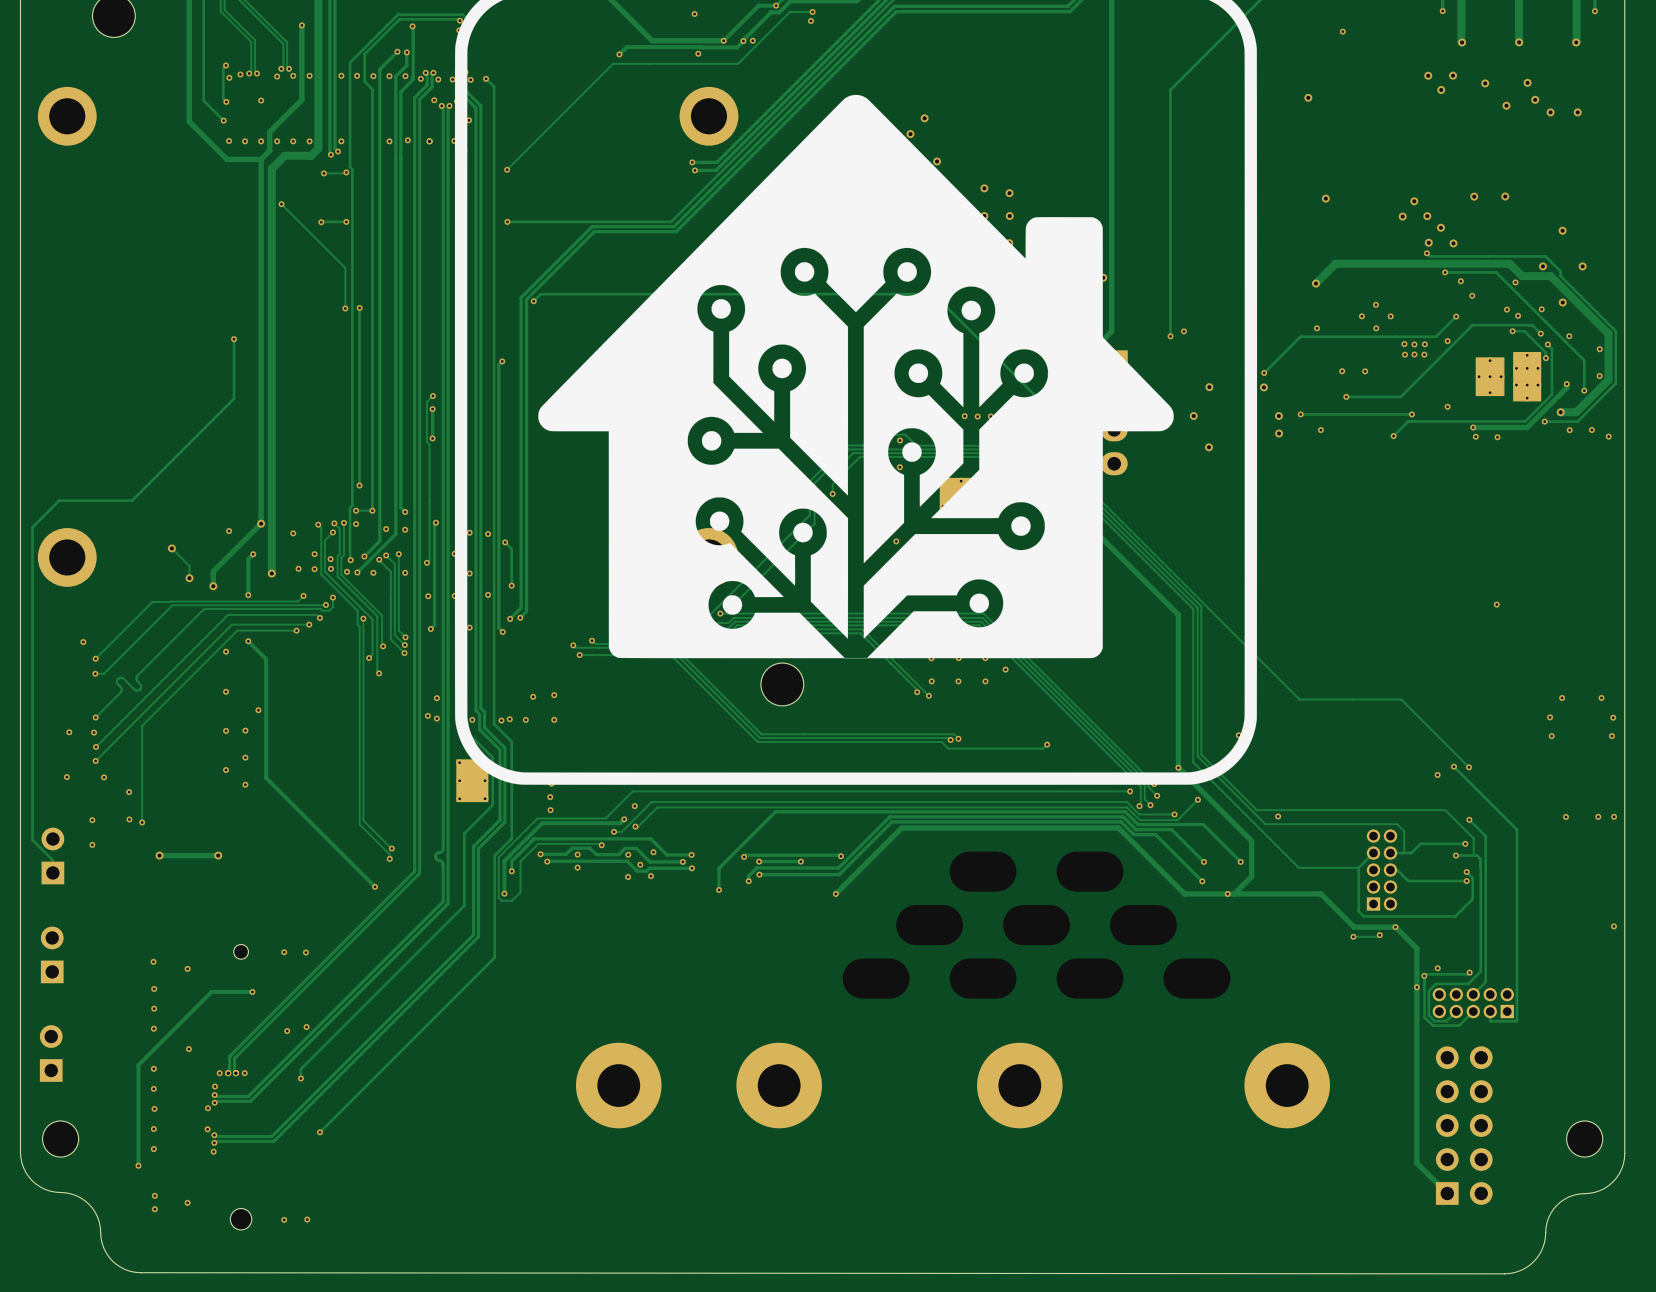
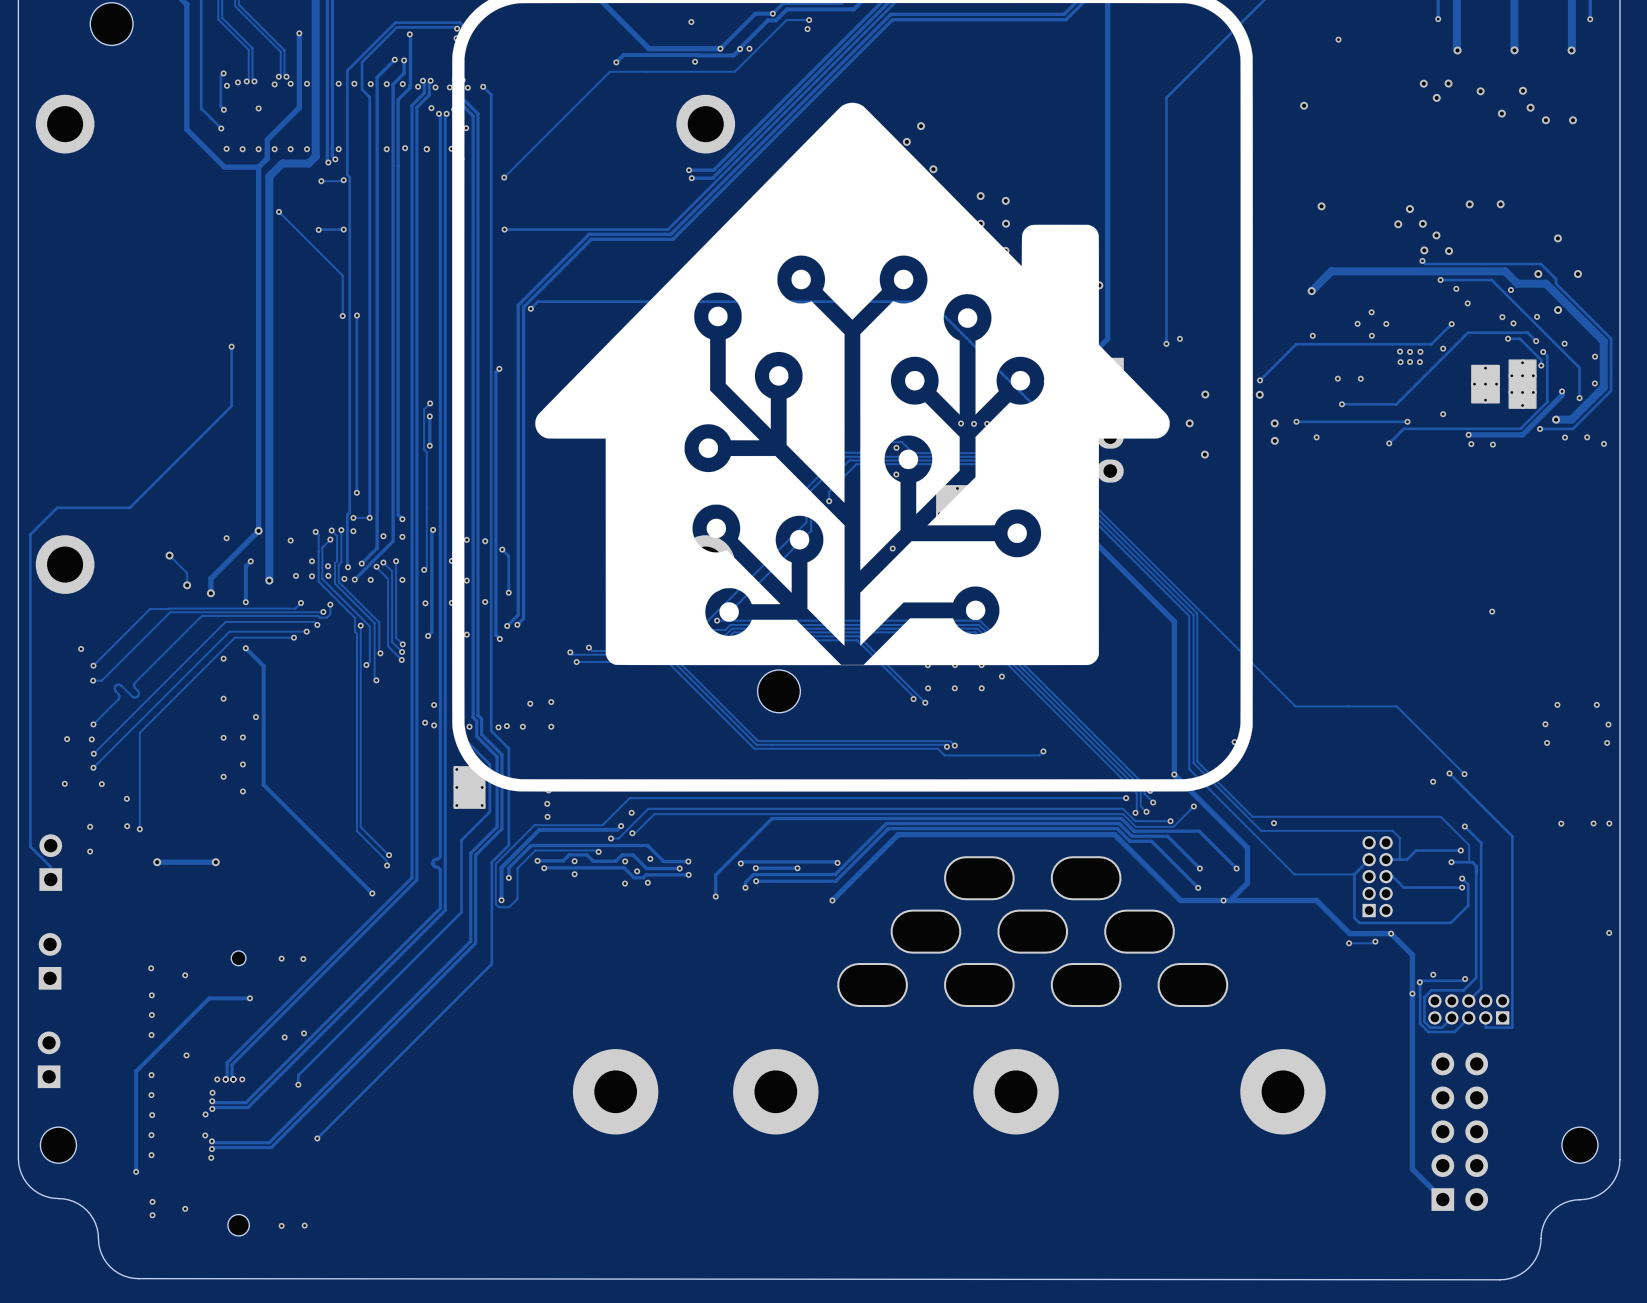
part footprint: [949, 851, 1017, 892] -> [943, 856, 1015, 901]
part footprint: [1056, 851, 1124, 892] -> [1050, 856, 1122, 901]
part footprint: [896, 905, 964, 946] -> [890, 909, 962, 954]
part footprint: [1003, 905, 1070, 946] -> [997, 909, 1069, 954]
part footprint: [1110, 905, 1177, 946] -> [1104, 909, 1175, 954]
part footprint: [842, 958, 910, 999] -> [837, 962, 908, 1008]
part footprint: [949, 958, 1017, 999] -> [943, 962, 1015, 1008]
part footprint: [1056, 958, 1124, 999] -> [1050, 962, 1122, 1008]
part footprint: [1163, 958, 1231, 999] -> [1157, 962, 1229, 1008]

